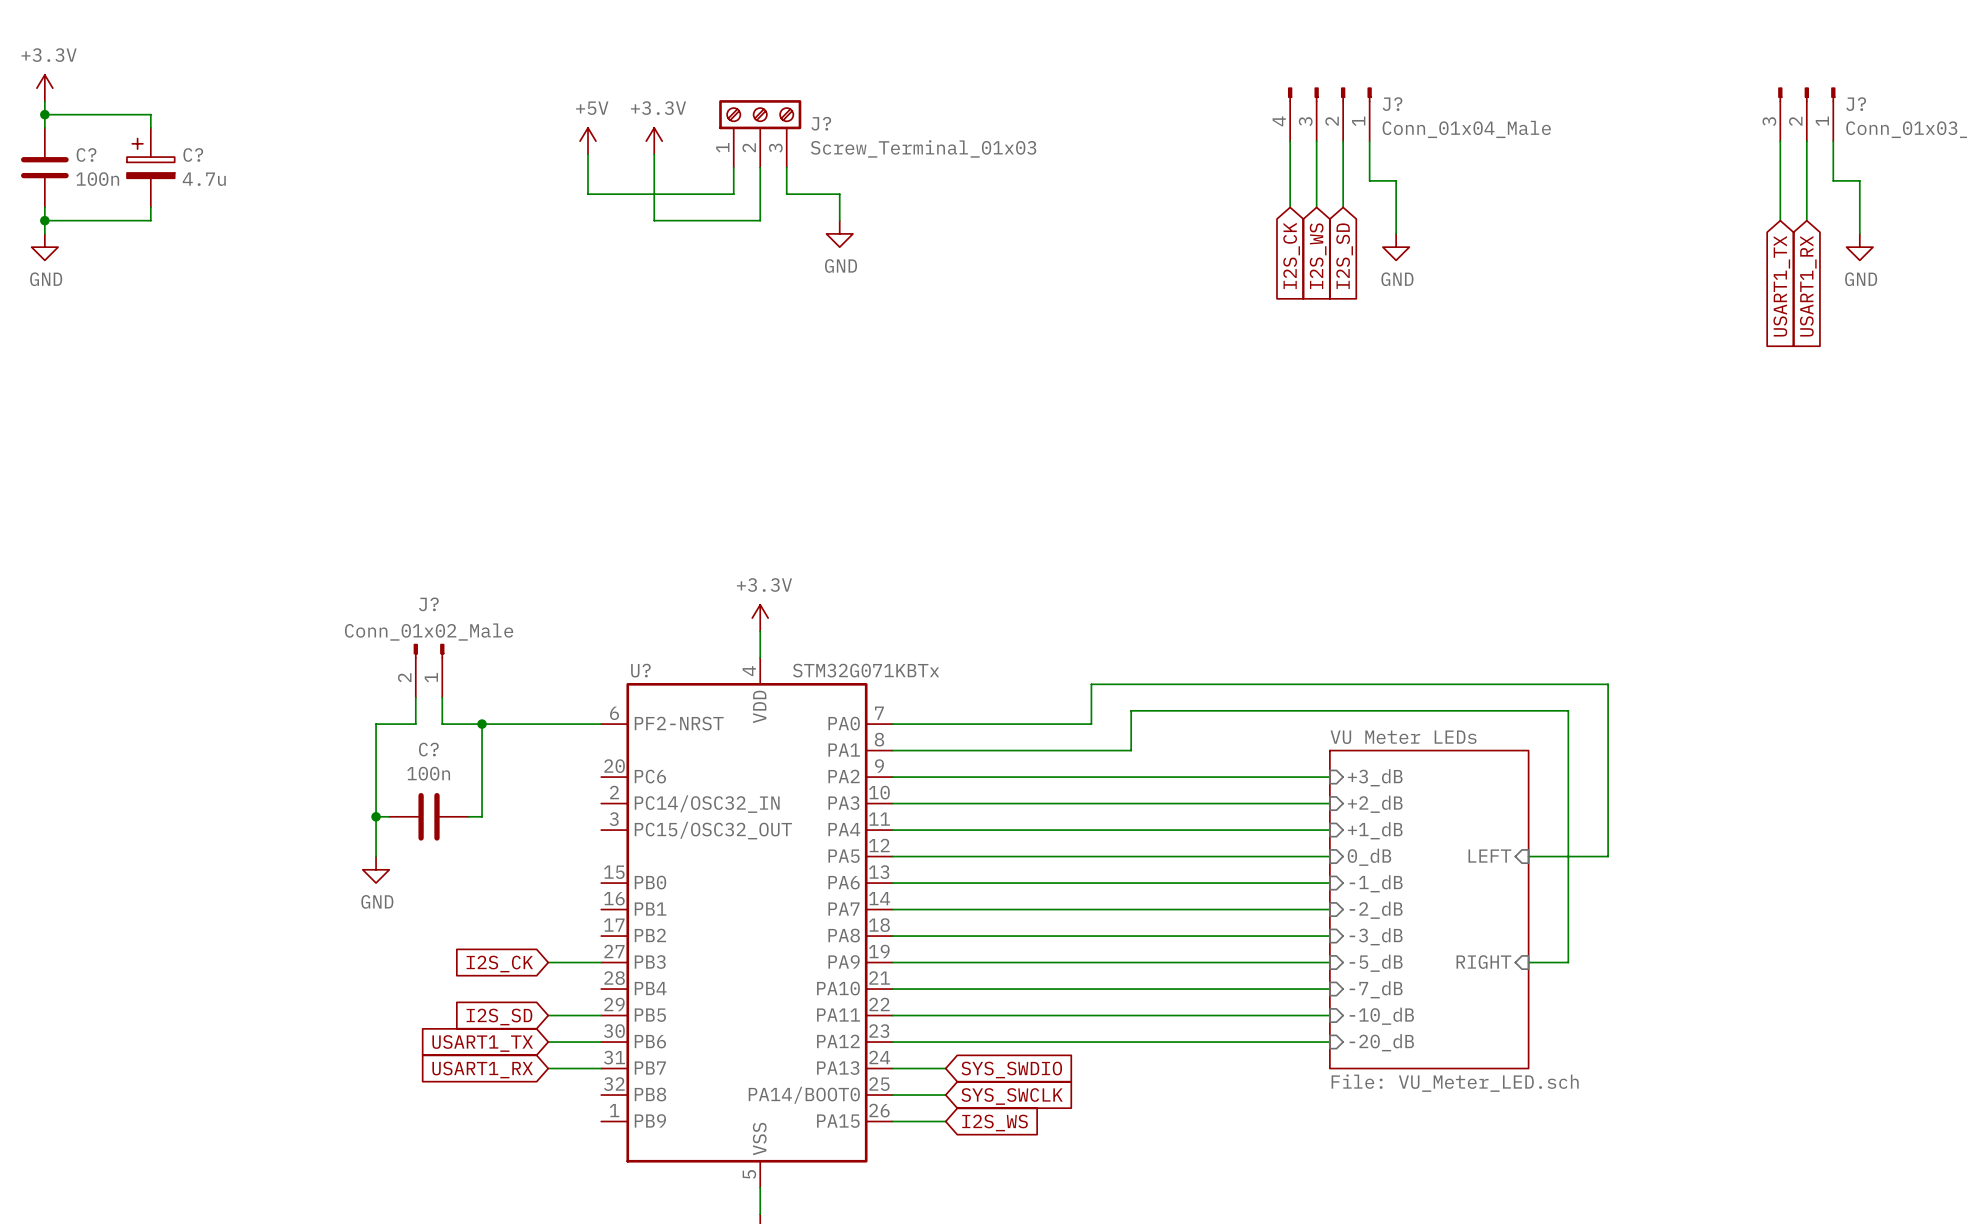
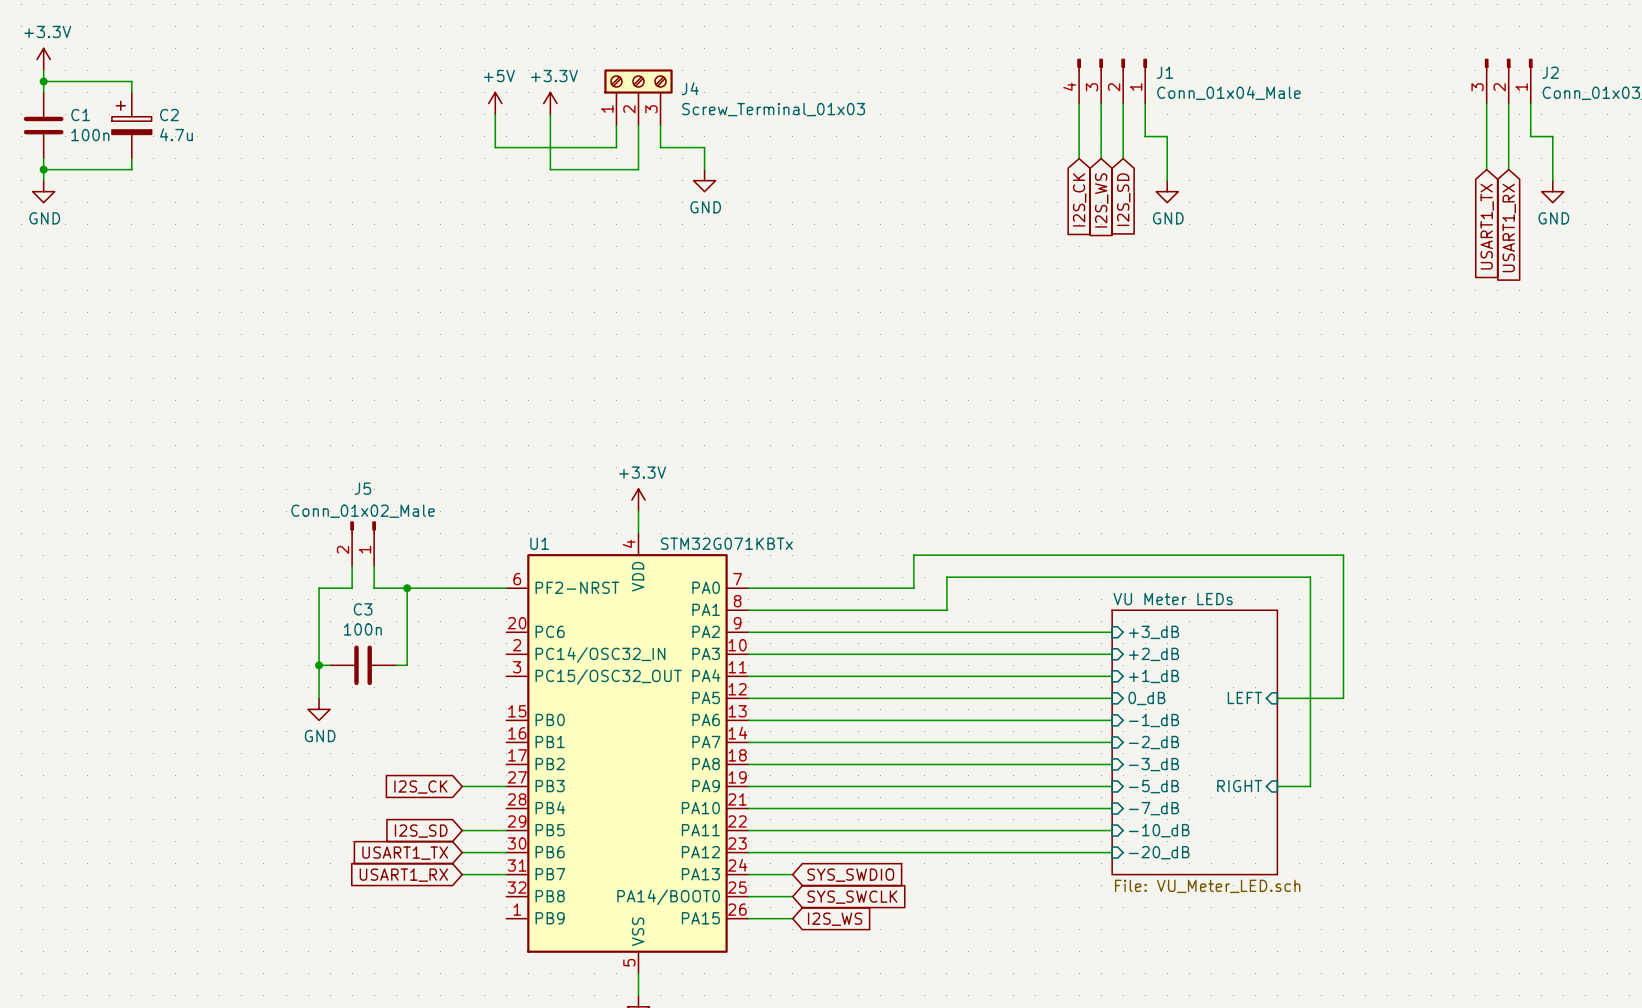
J? name: J? (1392, 104) -> J1 (1164, 72)
J? name: J? (1856, 104) -> J2 (1550, 72)
J? name: J? (821, 123) -> J4 (690, 88)
C? name: C? (86, 154) -> C1 (80, 115)
C? name: C? (193, 154) -> C2 (169, 115)
J? name: J? (428, 604) -> J5 (362, 488)
U? name: U? (640, 670) -> U1 (539, 543)
C? name: C? (428, 749) -> C3 (363, 609)

